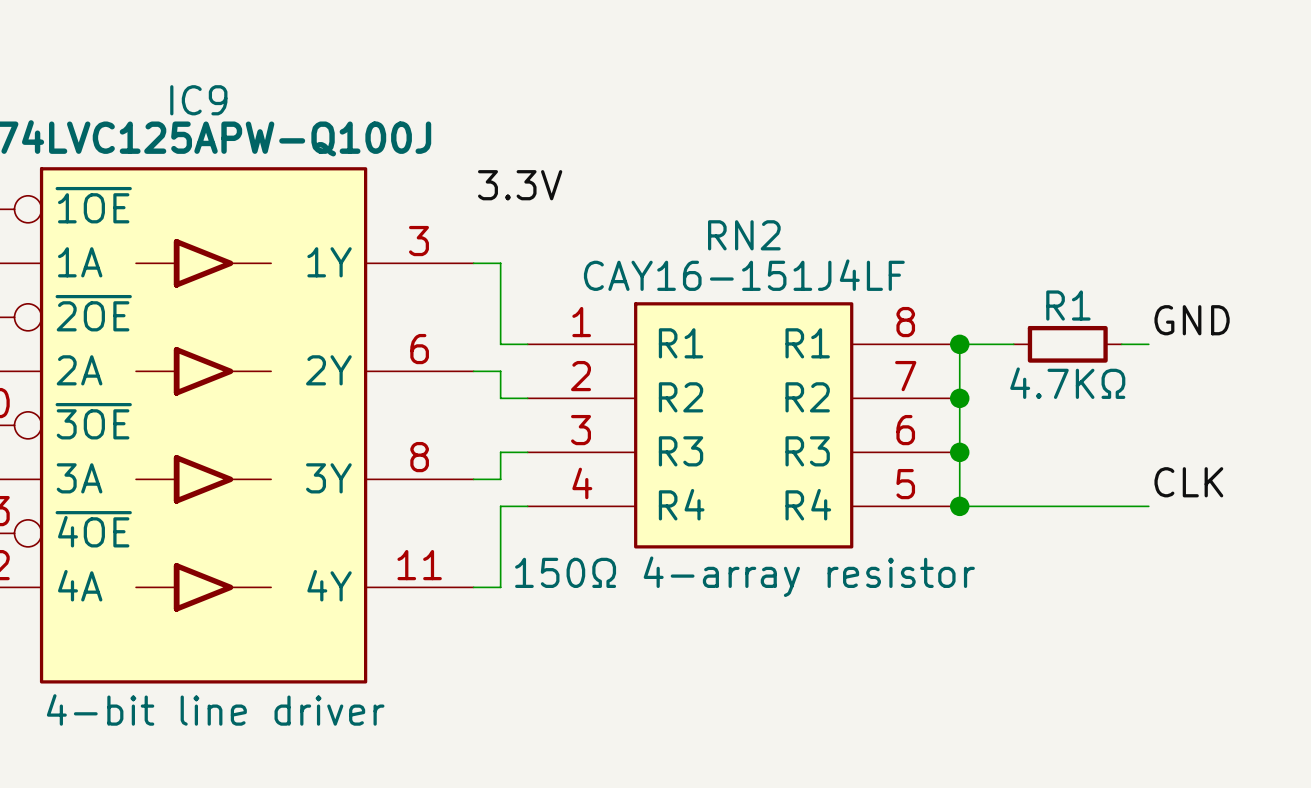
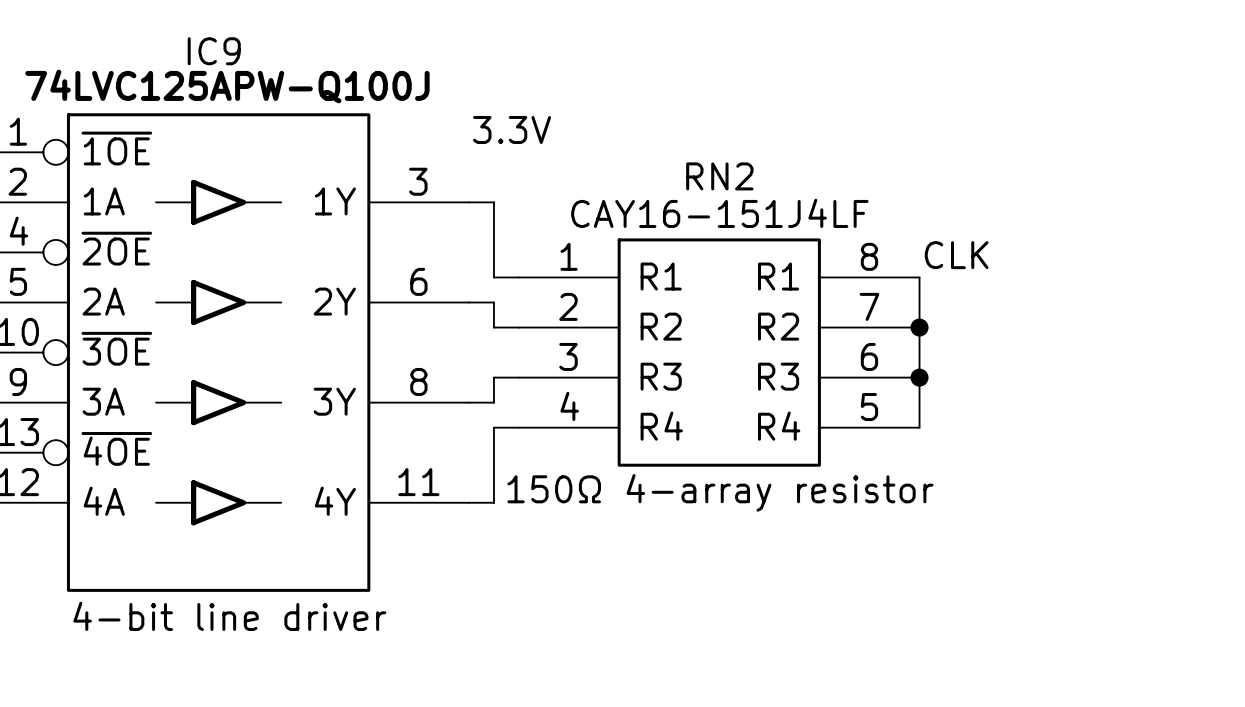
label: GND (1192, 320) -> none
wire: (959, 344) (1013, 344) -> none
junction: (959, 344) -> none
R1: 4.7KΩ (1067, 344) -> none
wire: (1121, 344) (1148, 344) -> none
label position: CLK (1188, 482) -> CLK (956, 255)
wire: (959, 506) (1148, 506) -> none
junction: (959, 506) -> none

